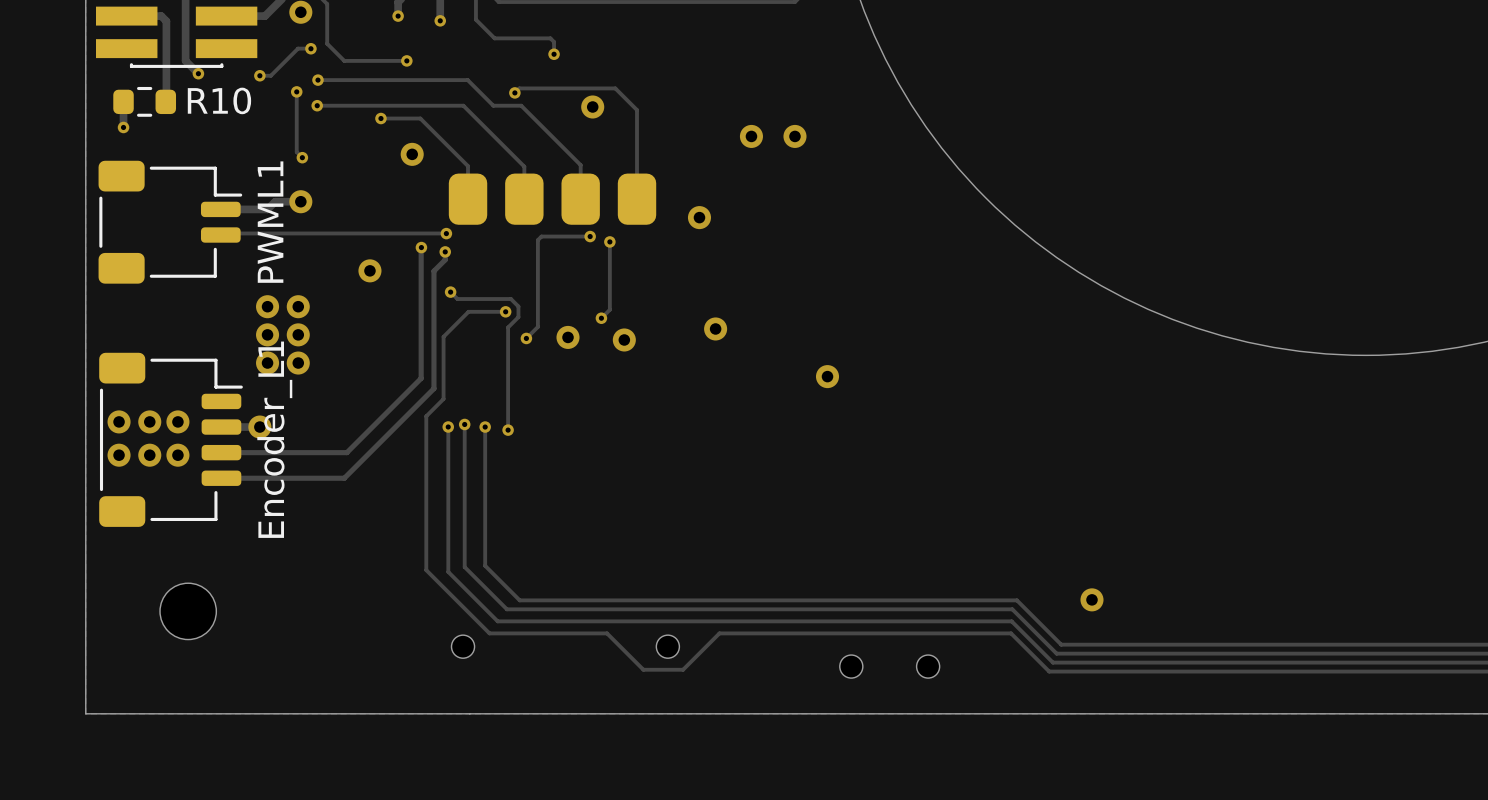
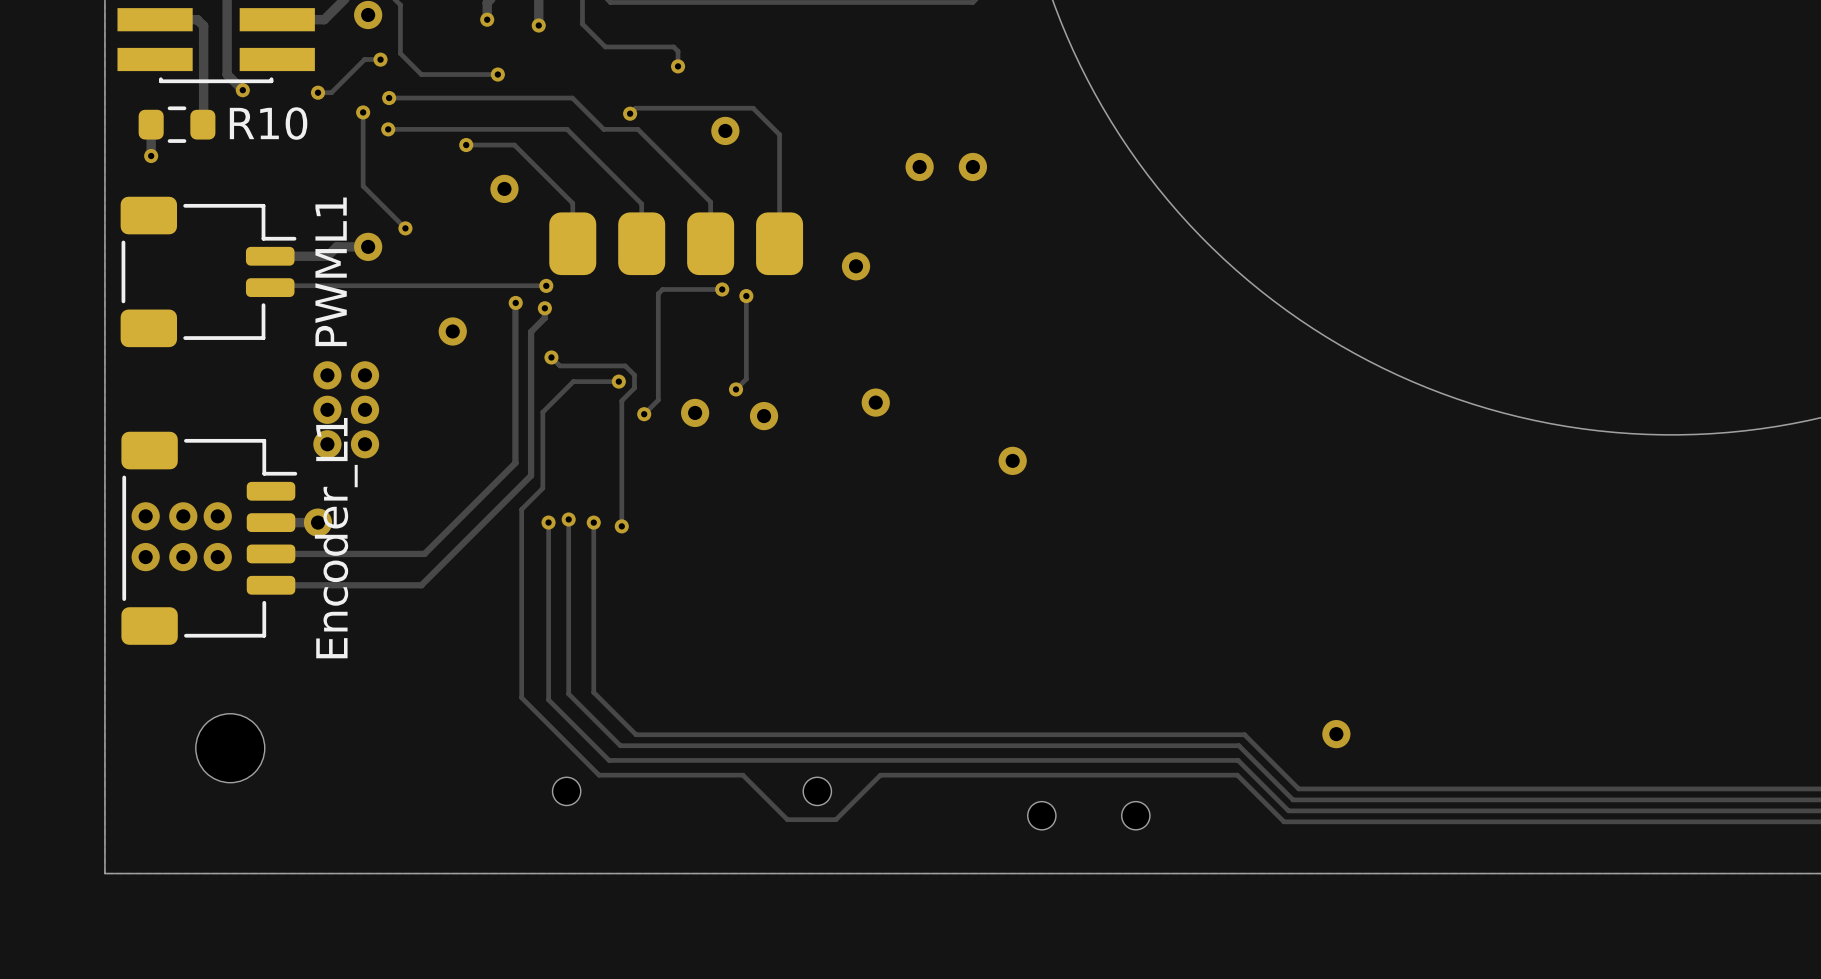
track: none -> (370, 192) (405, 228)
via position: (302, 157) -> (405, 228)

